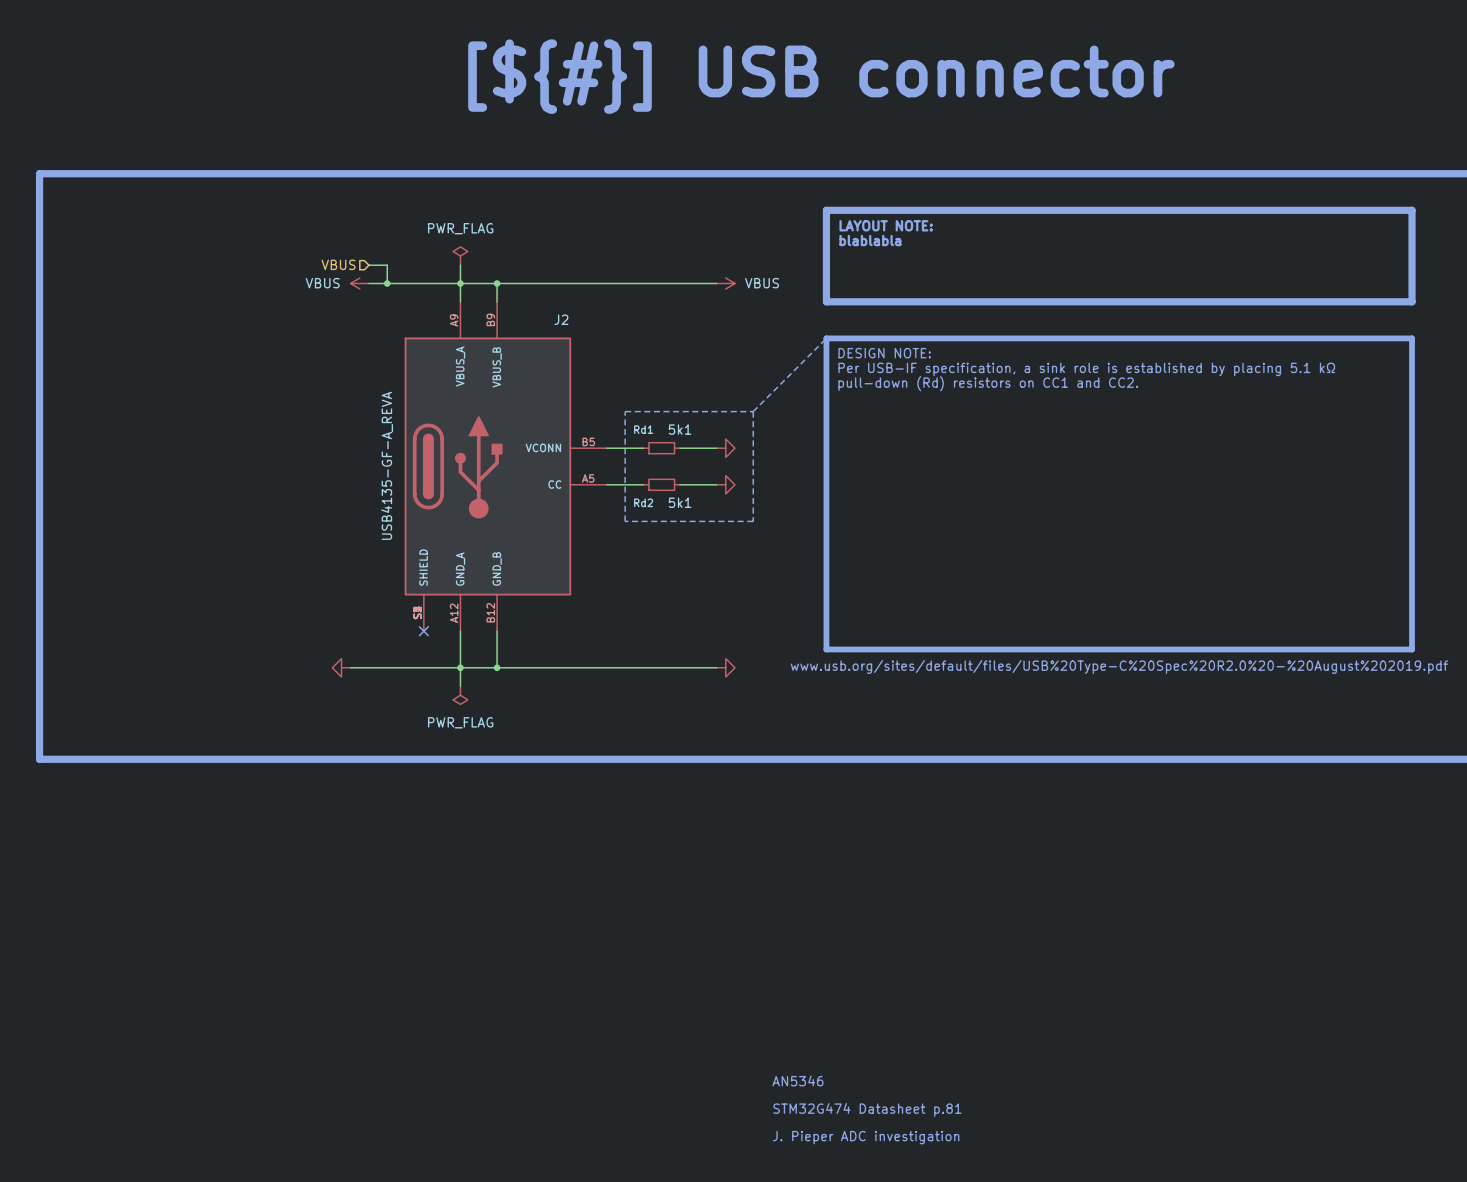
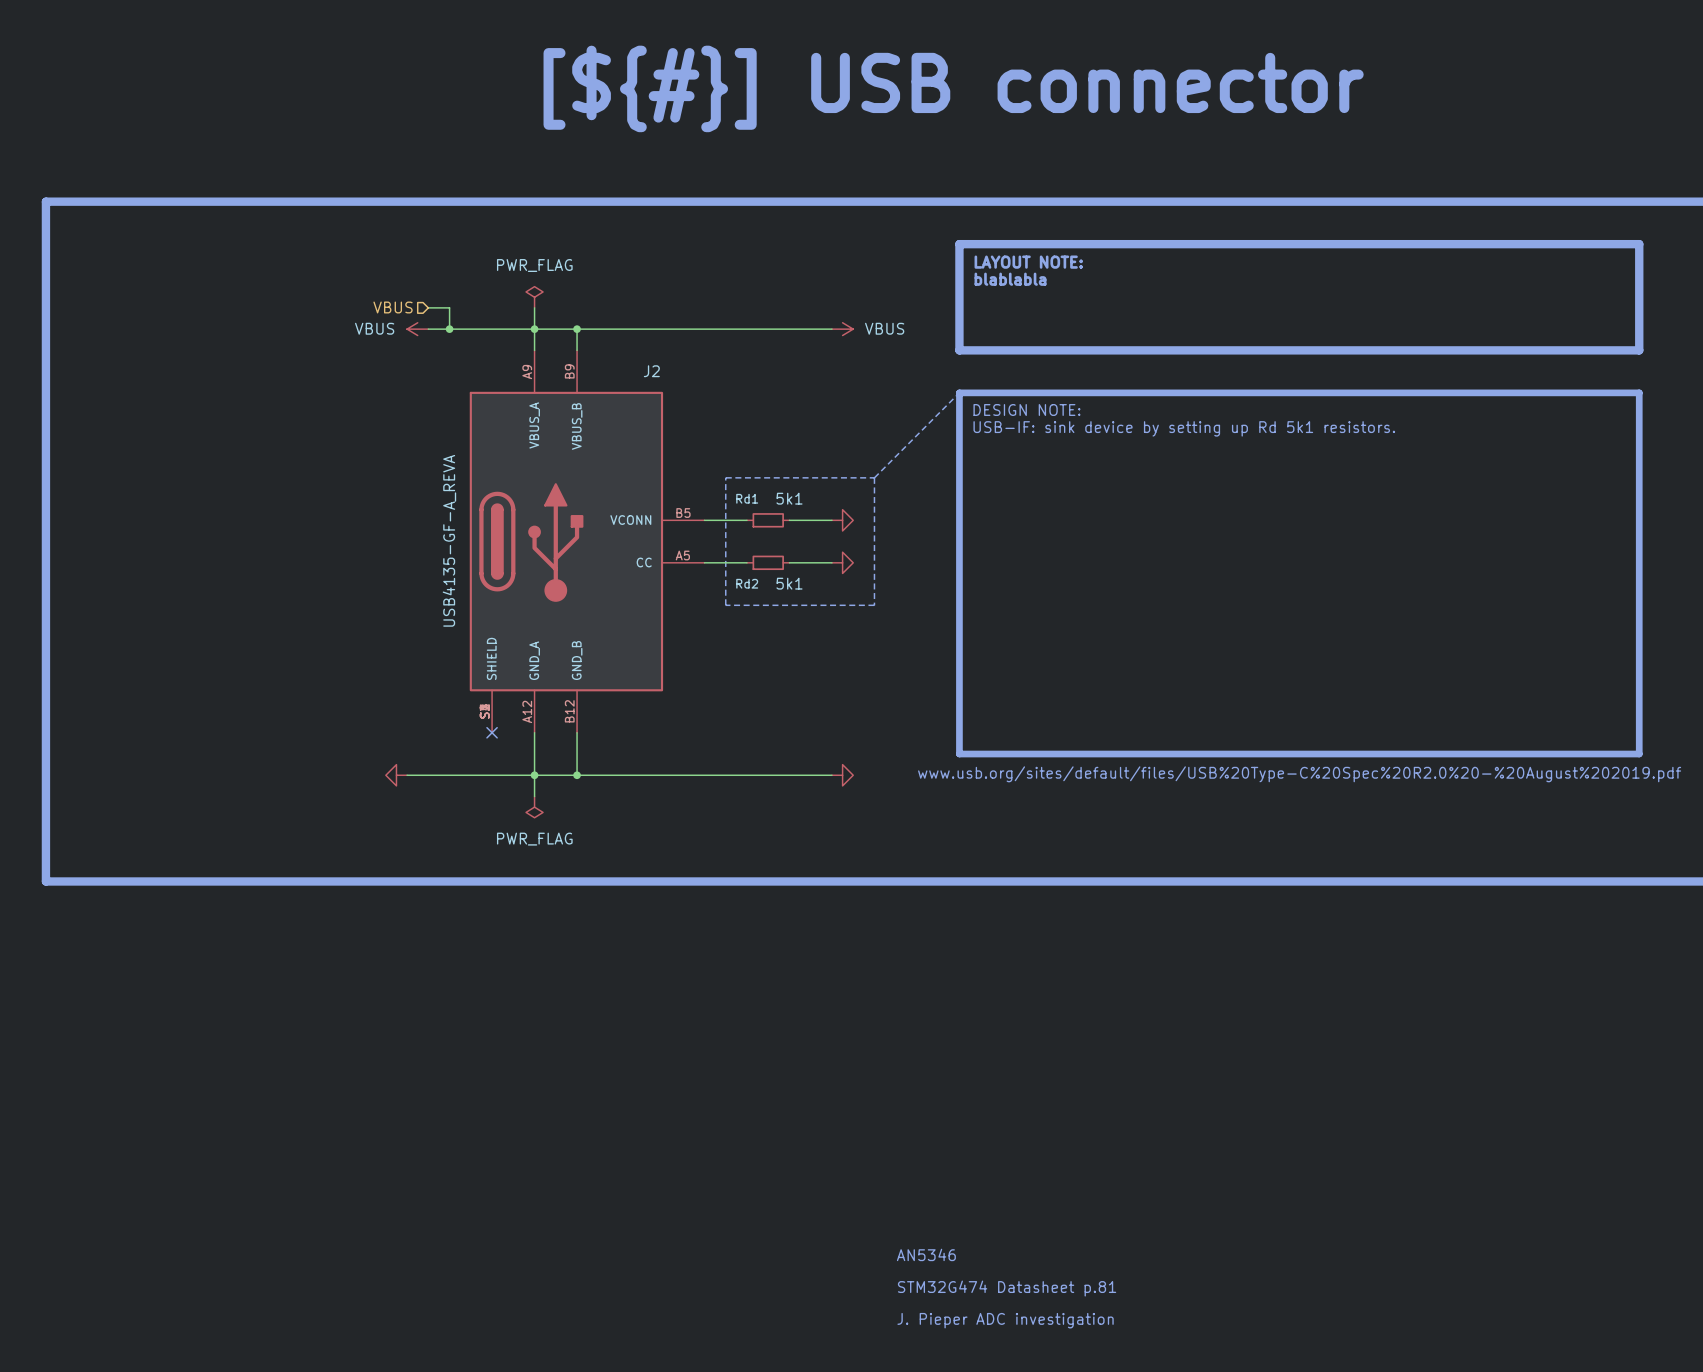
text: Per USB-IF specification, a sink role is established by placing 5.1 kΩ (1086, 369) -> USB-IF: sink device by setting up Rd 5k1 resistors. (1184, 428)
text: pull-down (Rd) resistors on CC1 and CC2. (988, 383) -> none

